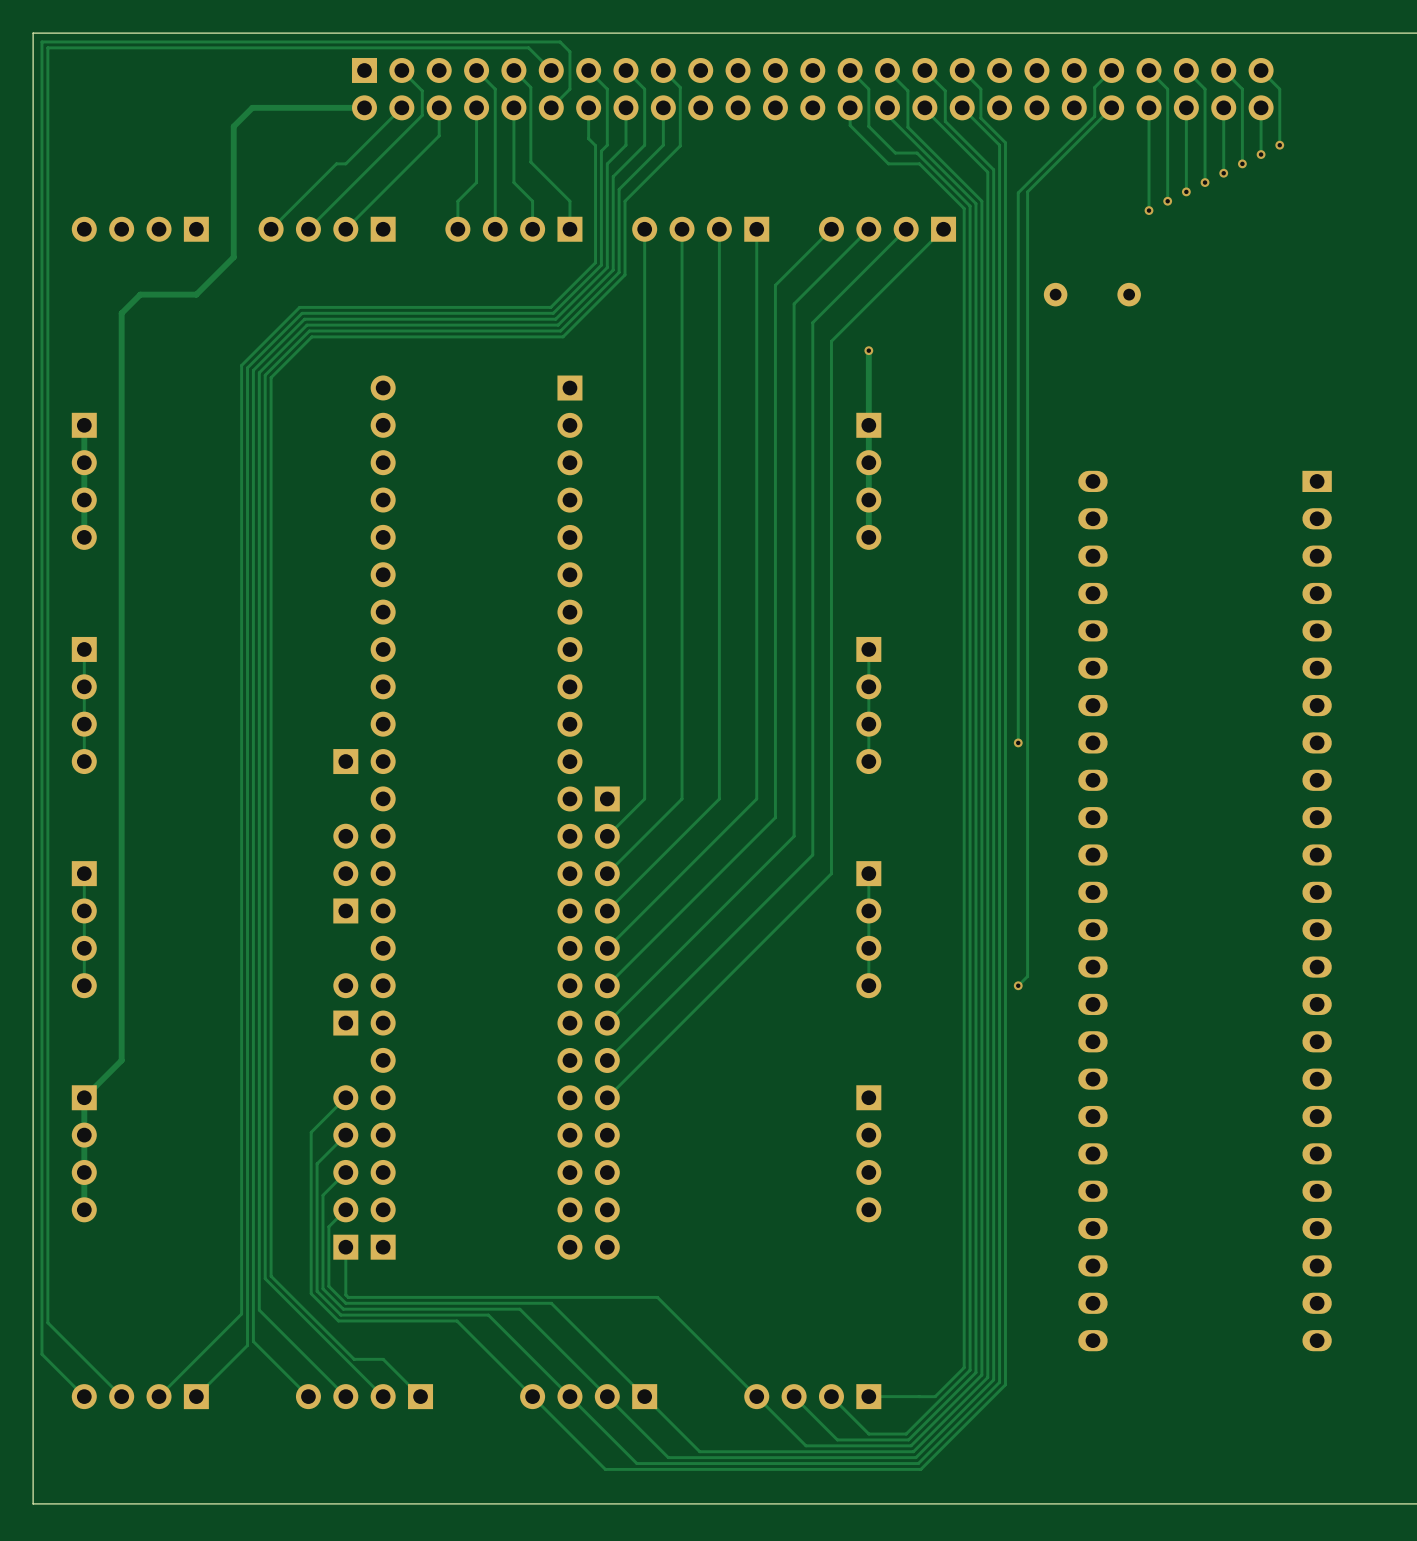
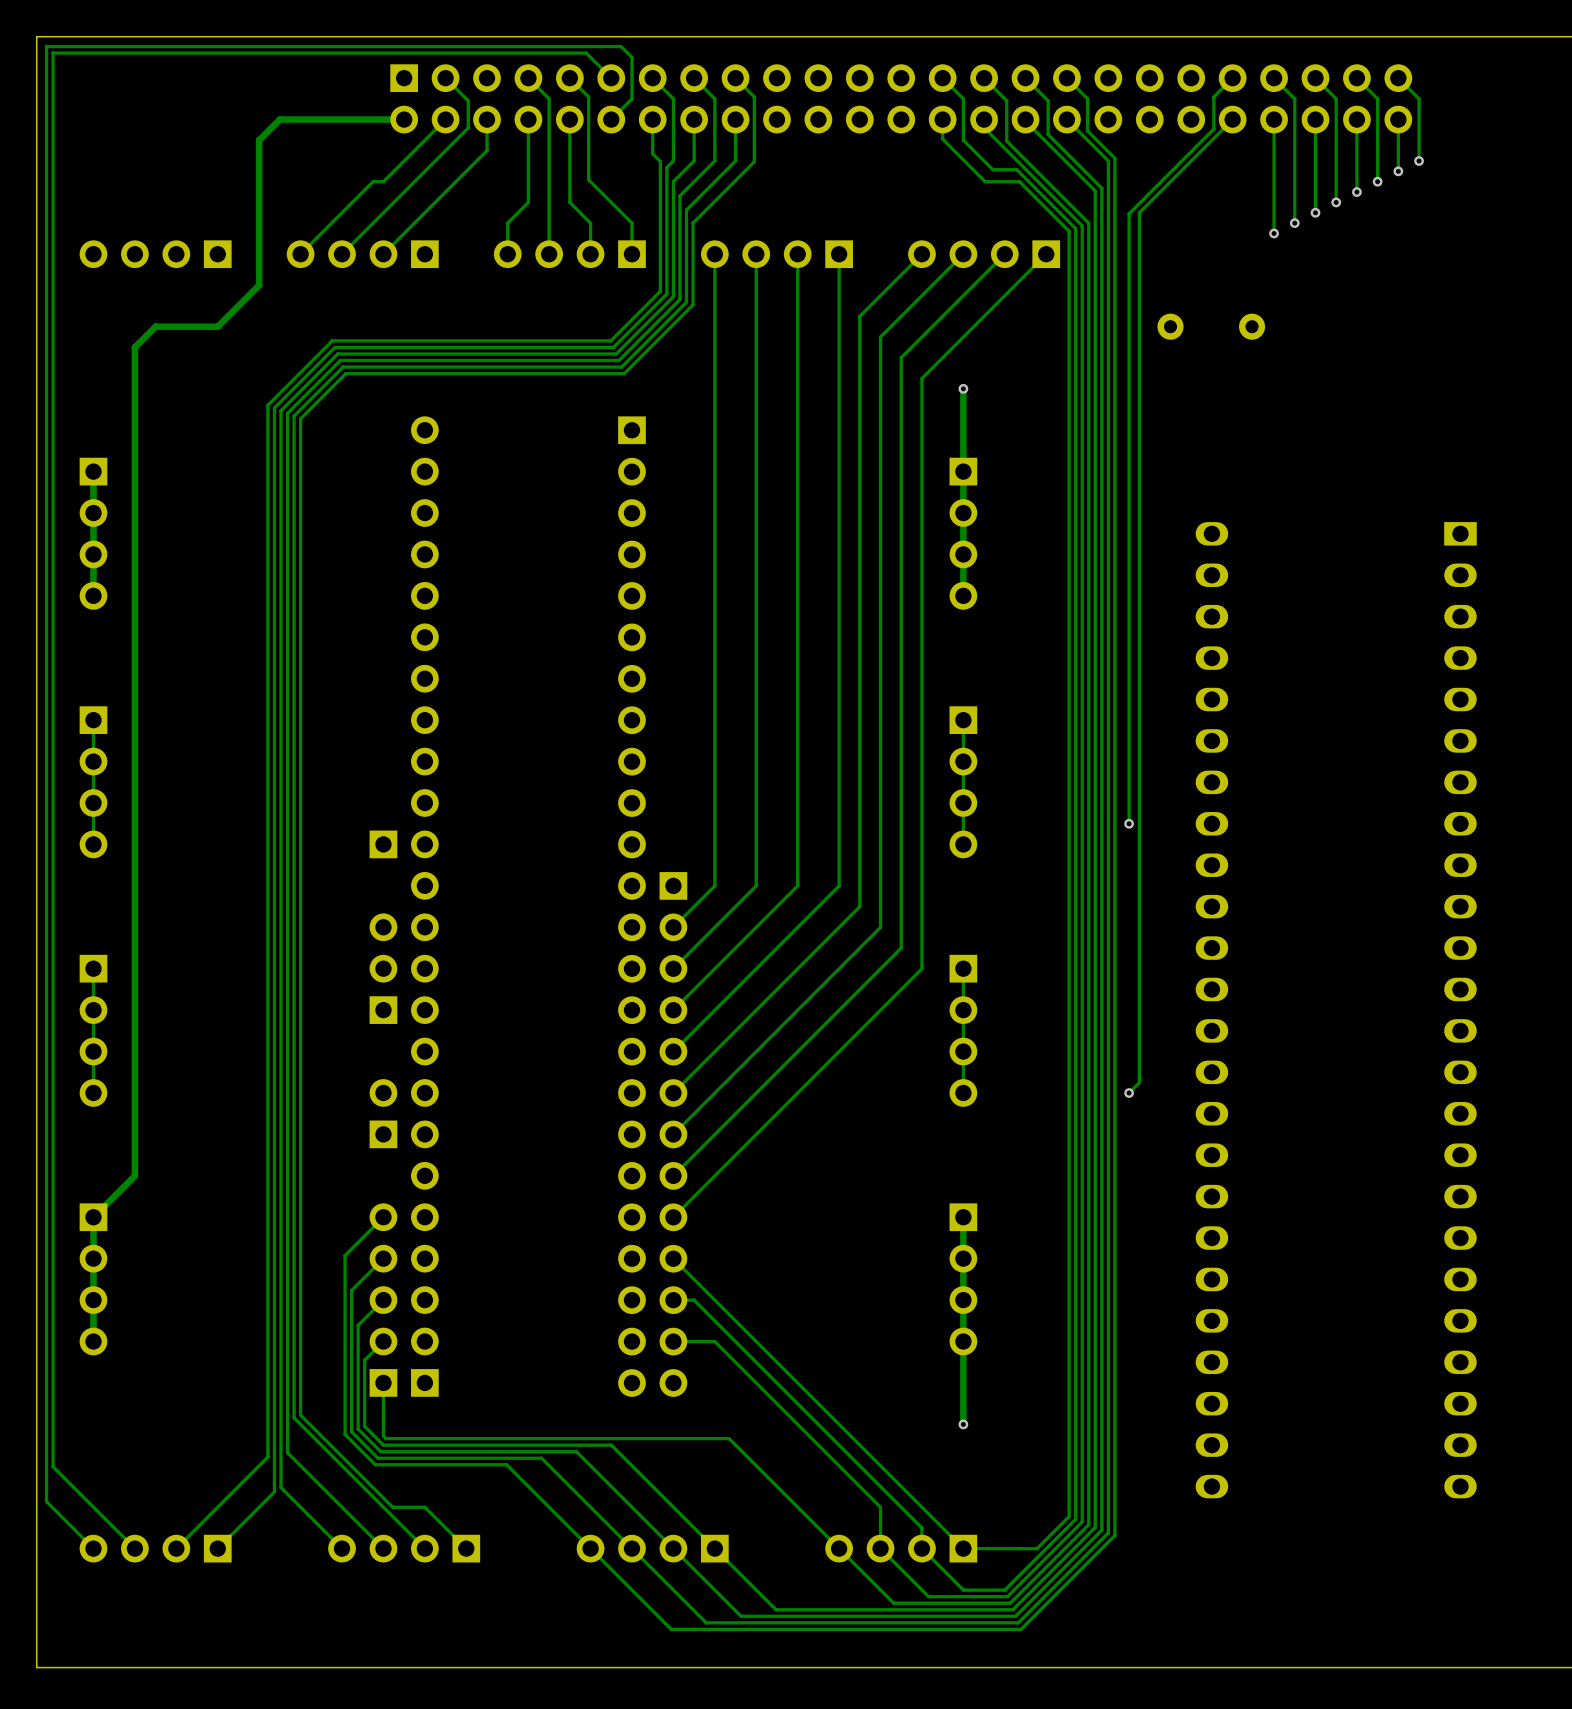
track: none -> (963, 1217) (963, 1424)
track: none -> (673, 1258) (963, 1548)
track: none -> (673, 1300) (694, 1300) (921, 1527) (921, 1548)
track: none -> (673, 1341) (714, 1341) (880, 1507) (880, 1548)
via: none -> (963, 1424)

